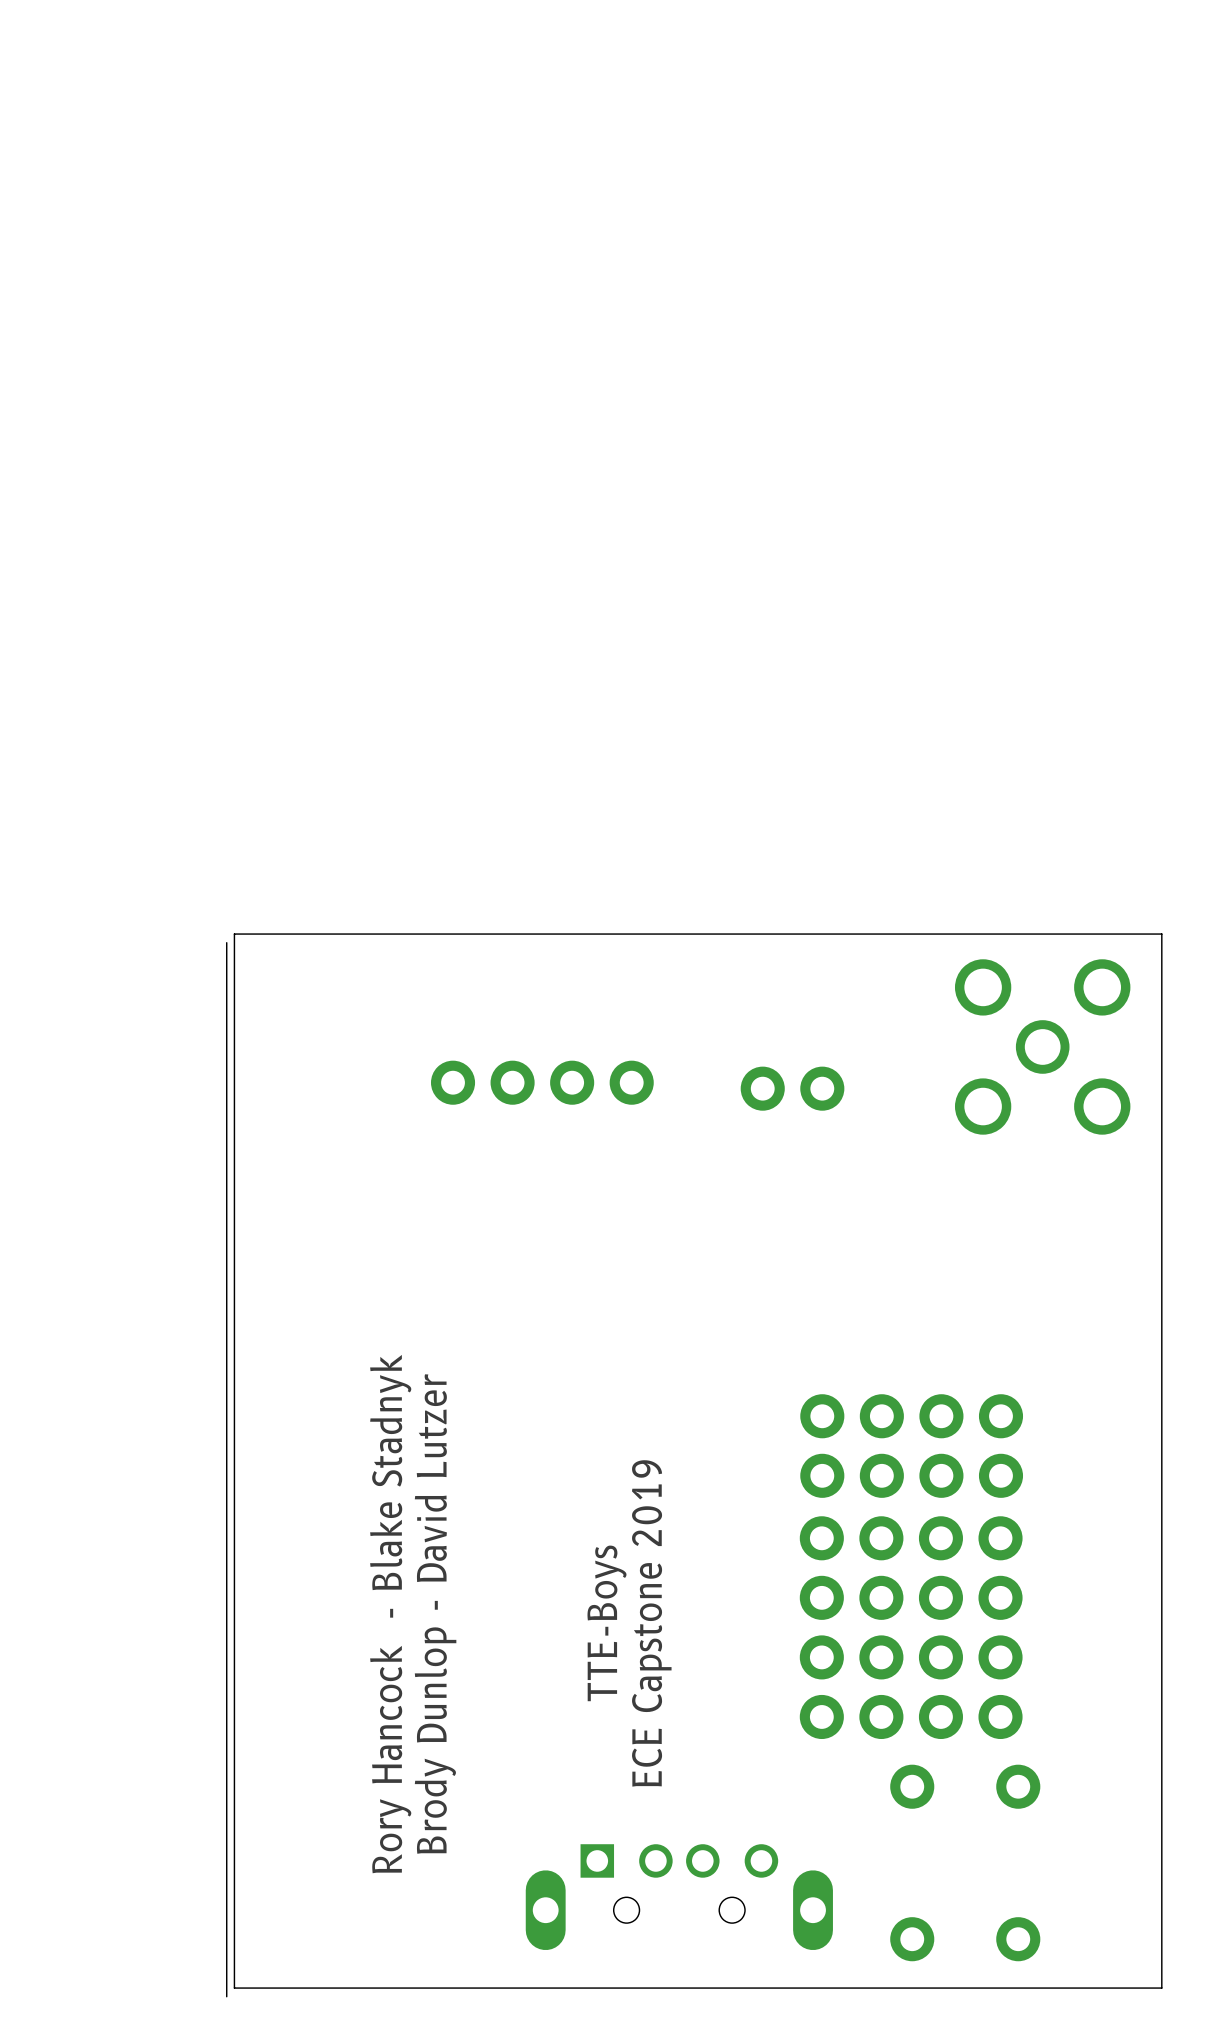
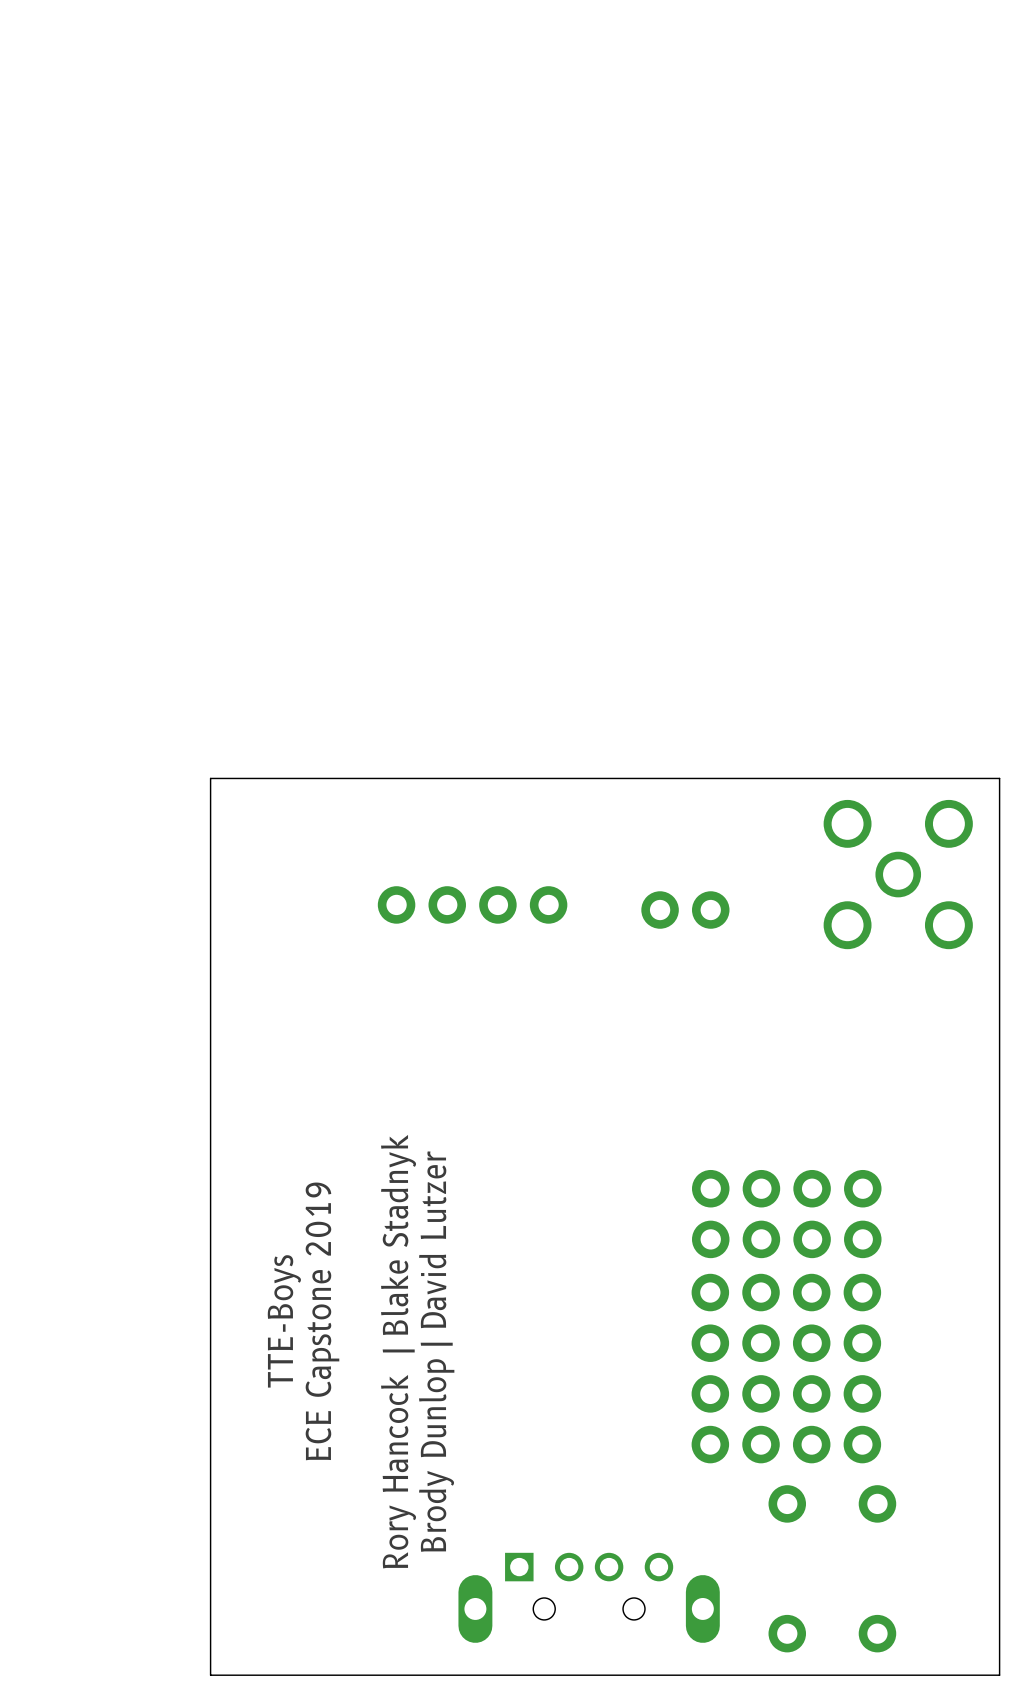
board edge: (226, 942) (226, 1996) -> none
text: none -> Brody Dunlop | David Lutzer (436, 1351)
text: Rory Hancock - Blake Stadnyk (390, 1614) -> none
text: Brody Dunlop - David Lutzer (435, 1614) -> Rory Hancock | Blake Stadnyk (398, 1351)
text position: TTE-Boys (606, 1623) -> TTE-Boys (284, 1321)
text position: ECE Capstone 2019 (651, 1623) -> ECE Capstone 2019 (322, 1321)

